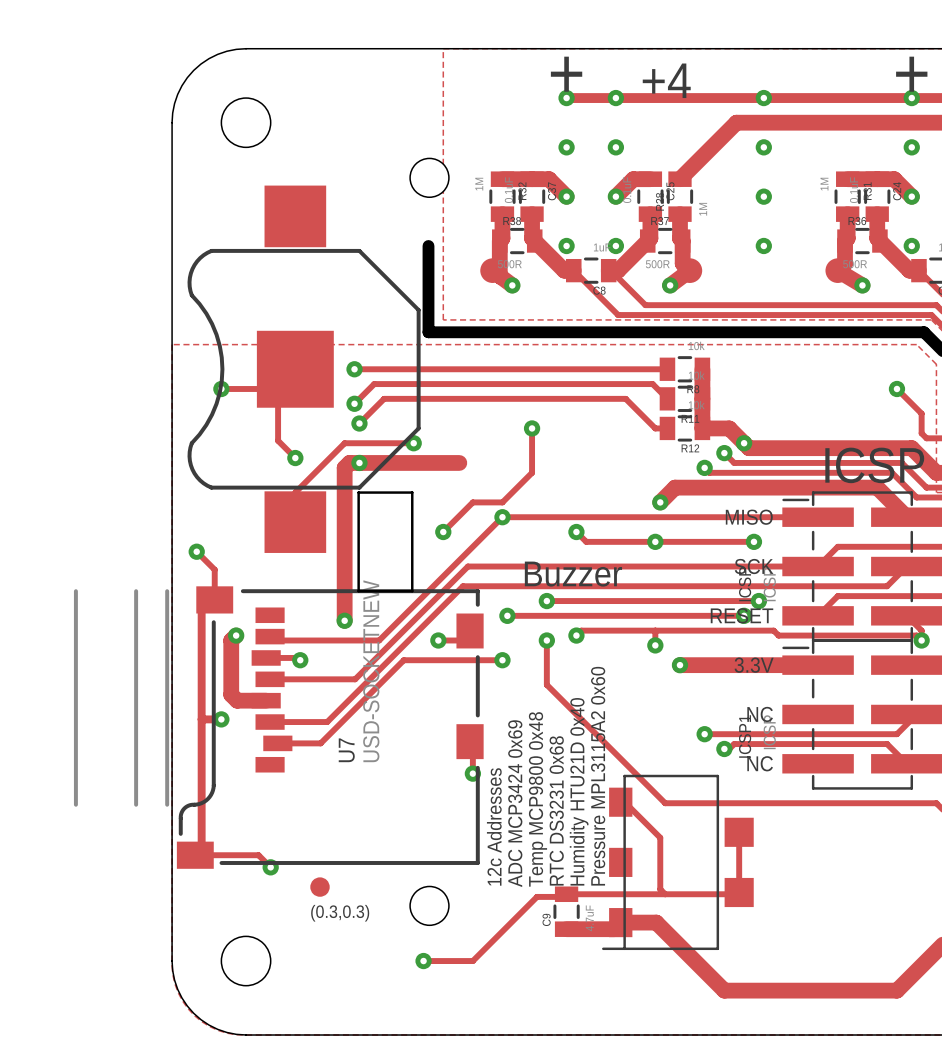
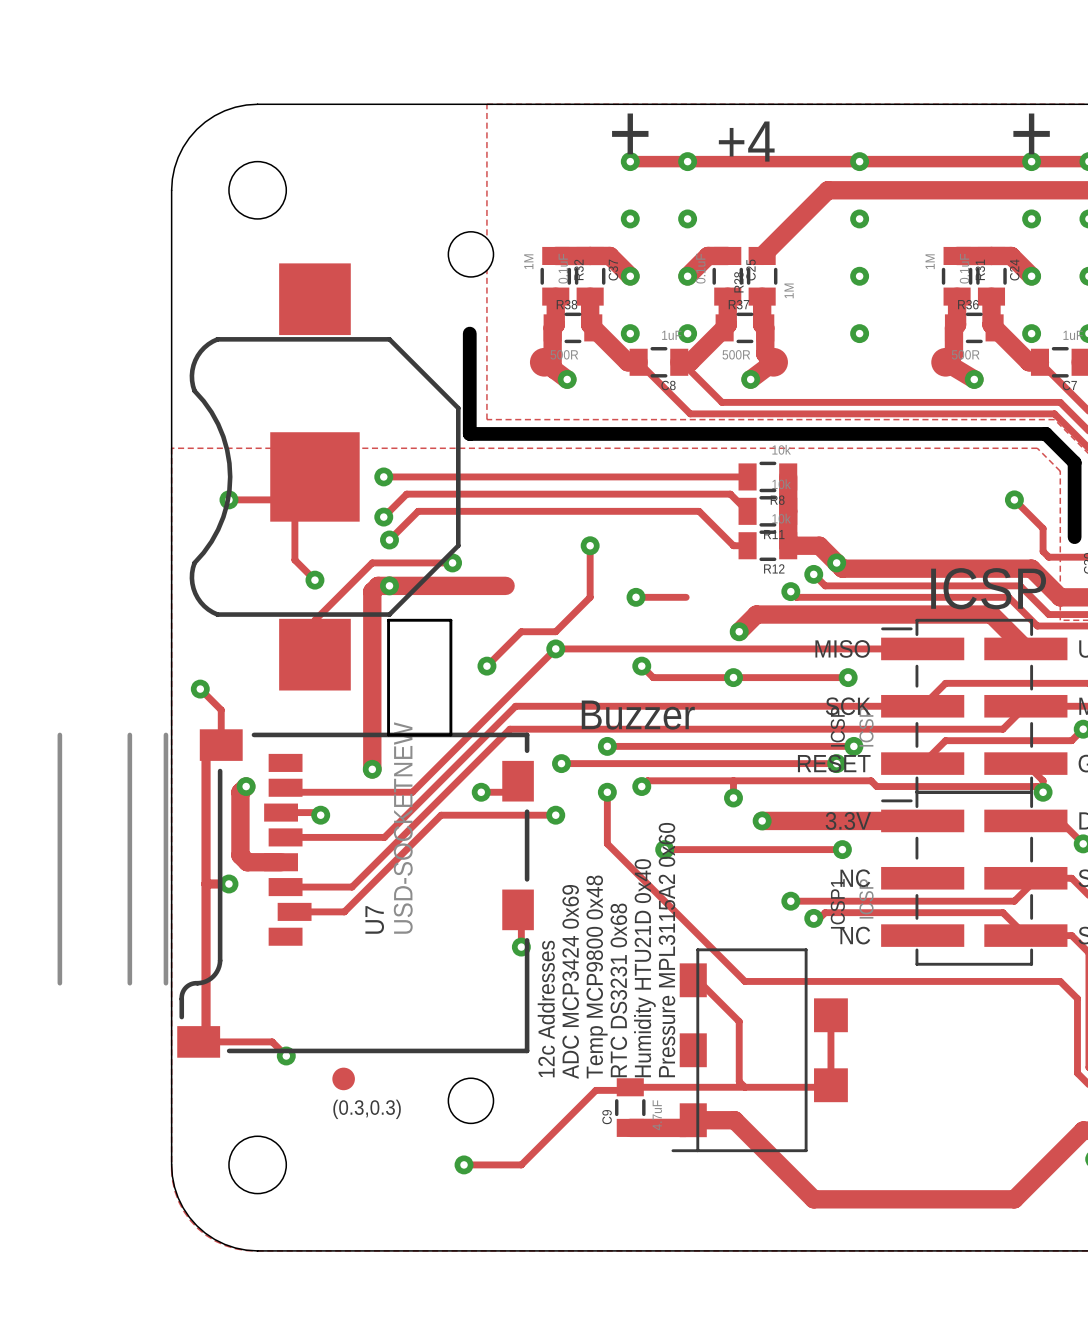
track: none -> (636, 597) (686, 597)
via: none -> (636, 597)
track: none -> (664, 849) (842, 849)
via: none -> (664, 849)
via: none -> (842, 849)

